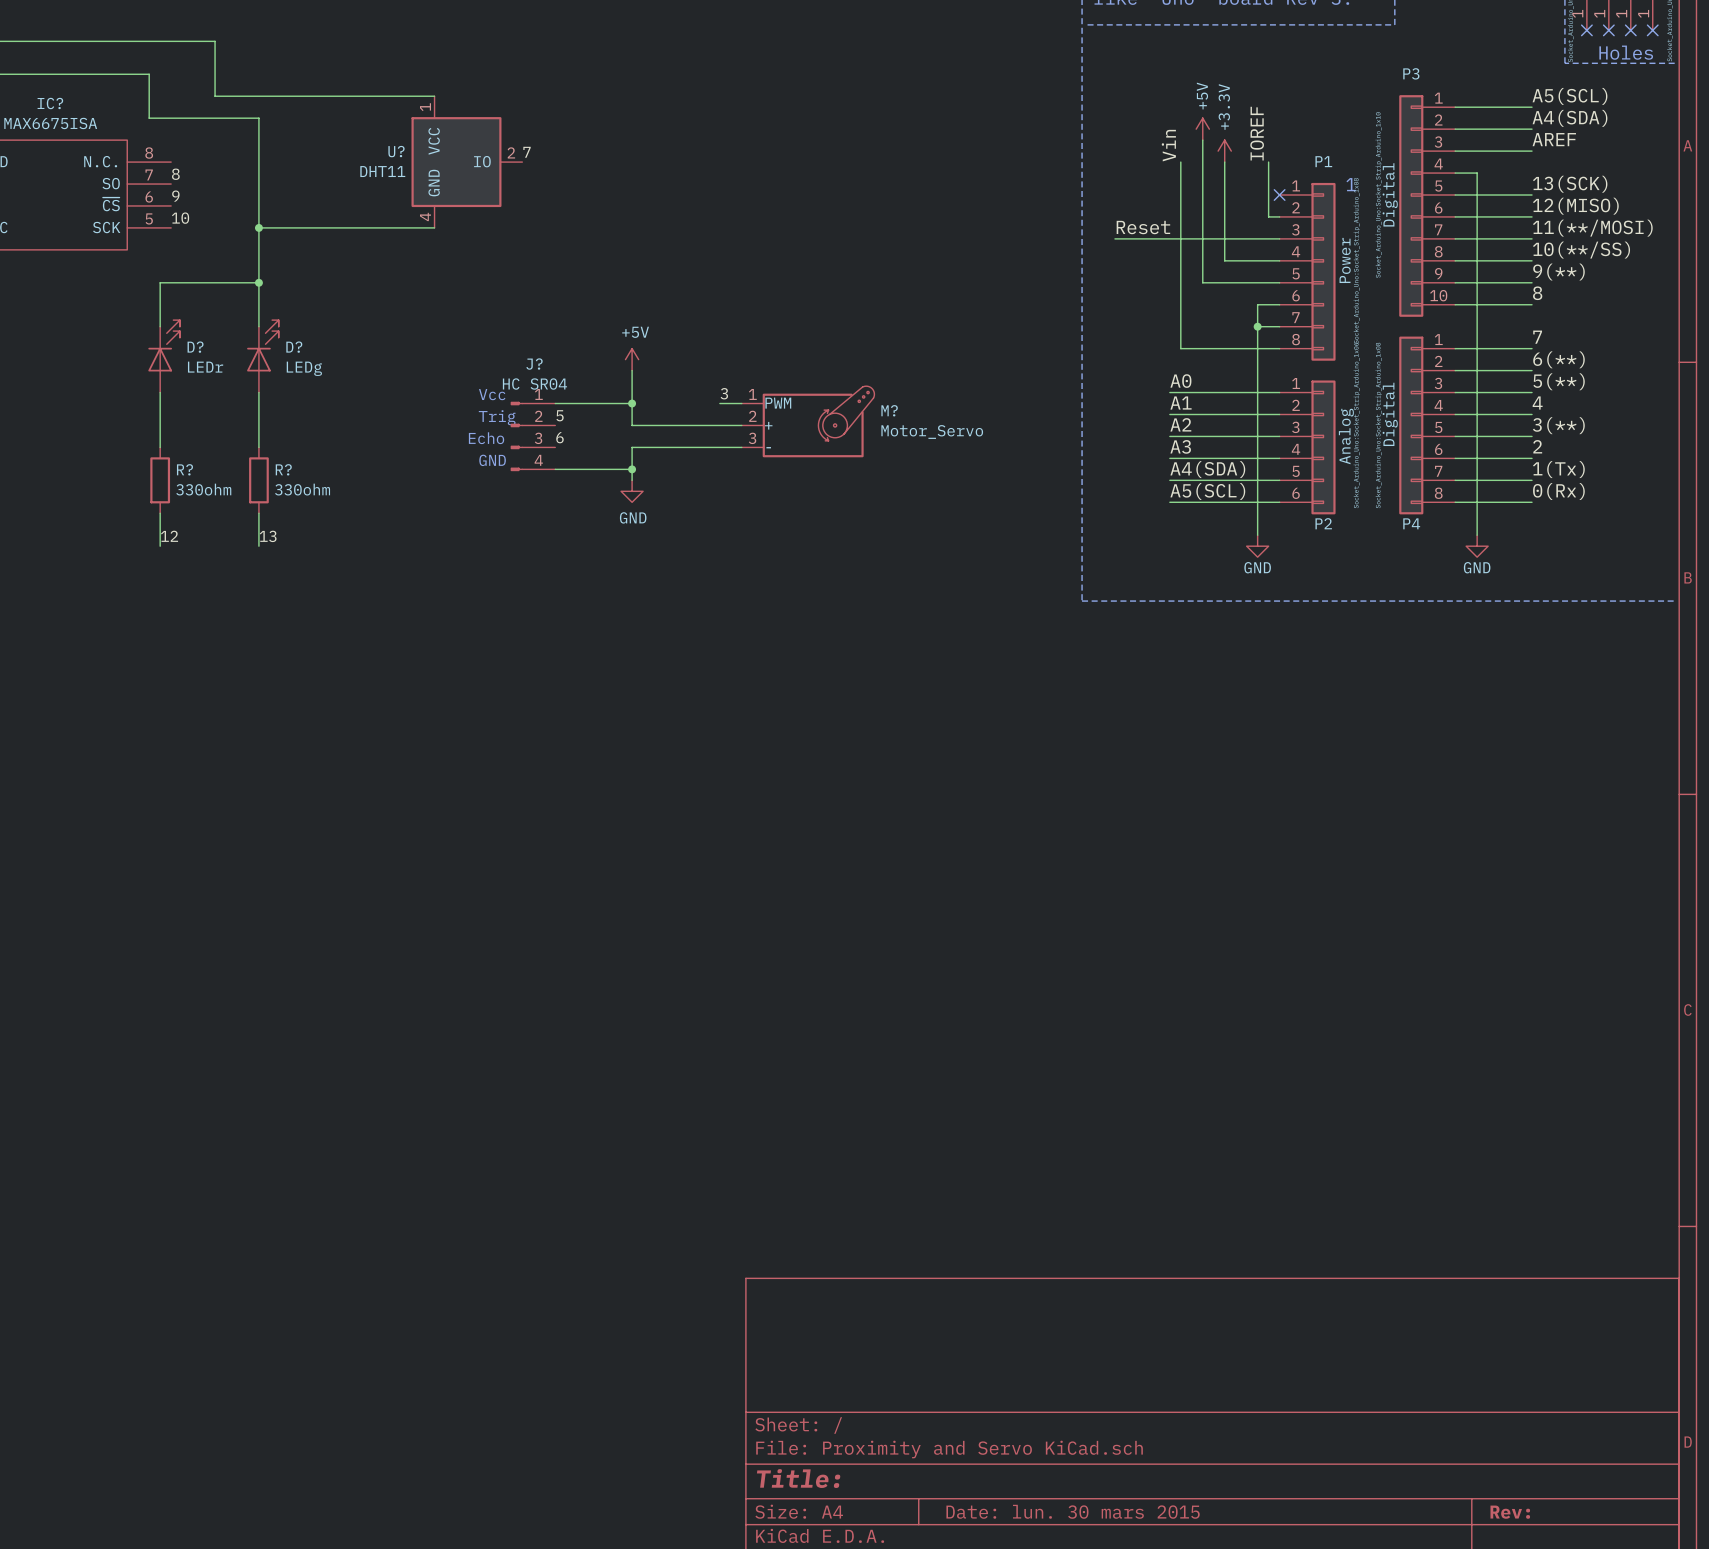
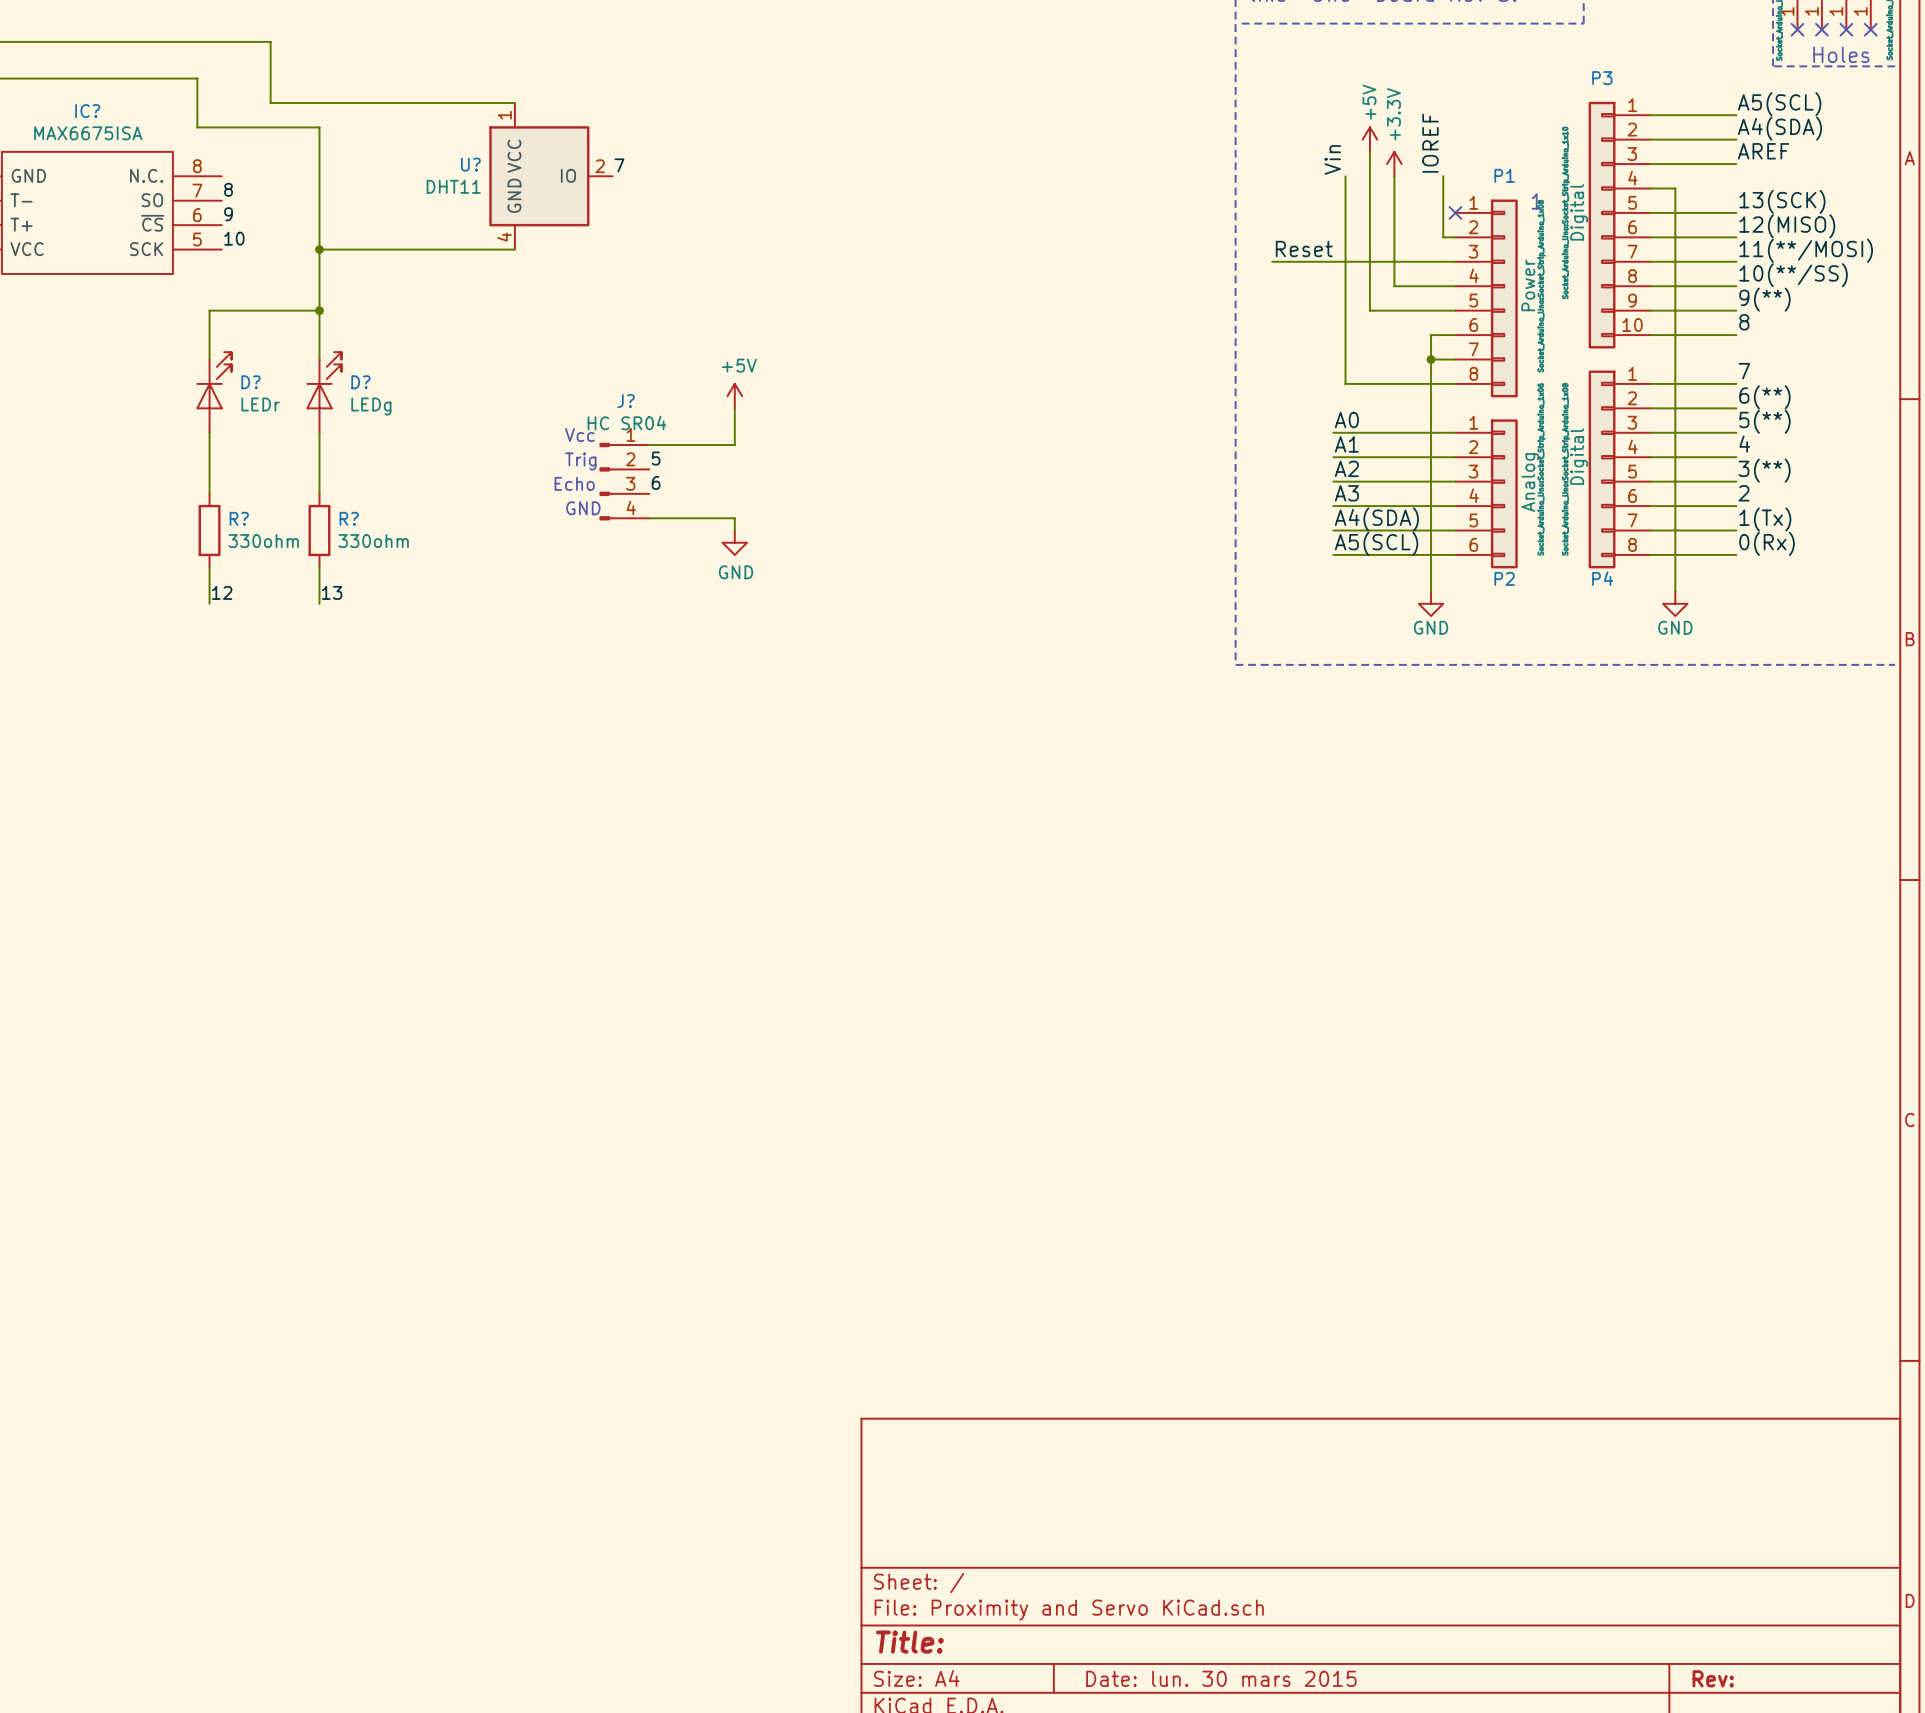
label: 3 (724, 393) -> none
wire: (632, 403) (632, 425) (741, 425) -> none
junction: (632, 403) -> none
wire: (719, 403) (741, 403) -> none
M?: Motor_Servo (808, 421) -> none
wire: (741, 447) (632, 447) (632, 469) -> none
junction: (632, 469) -> none

